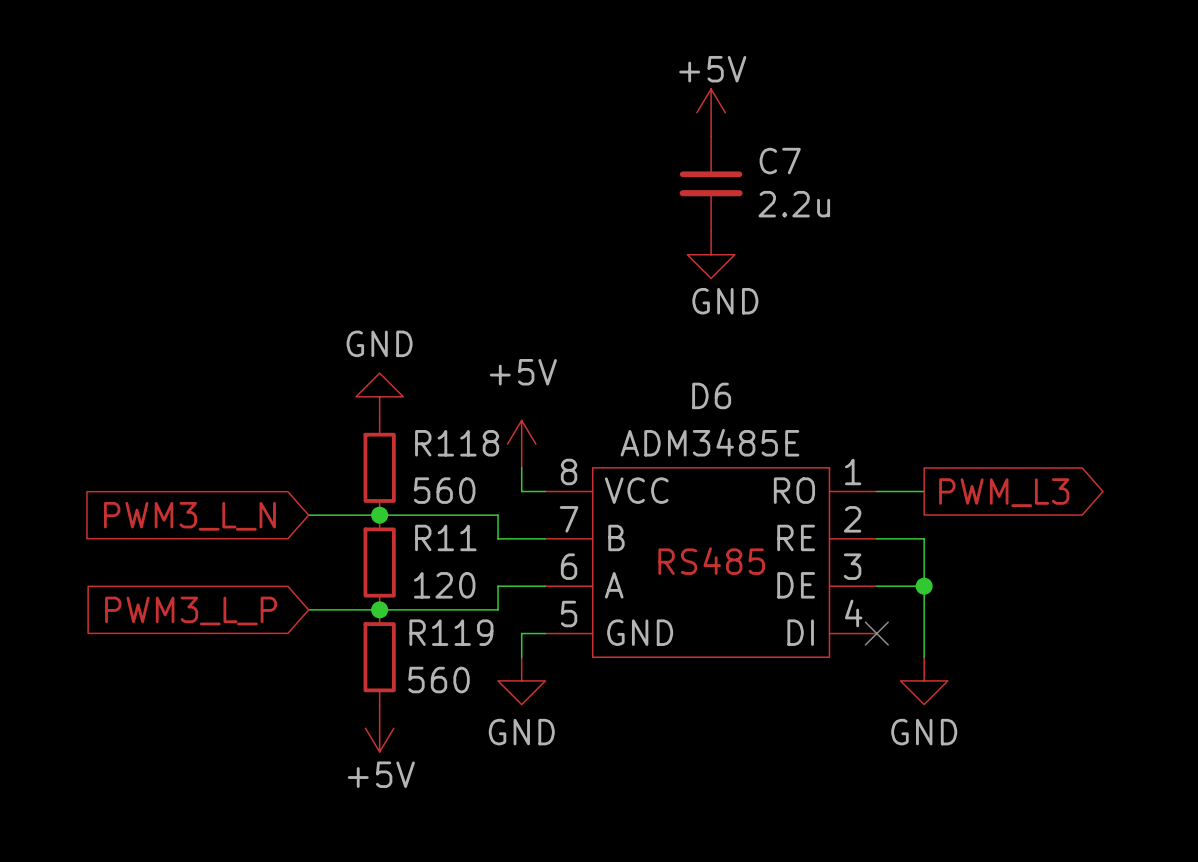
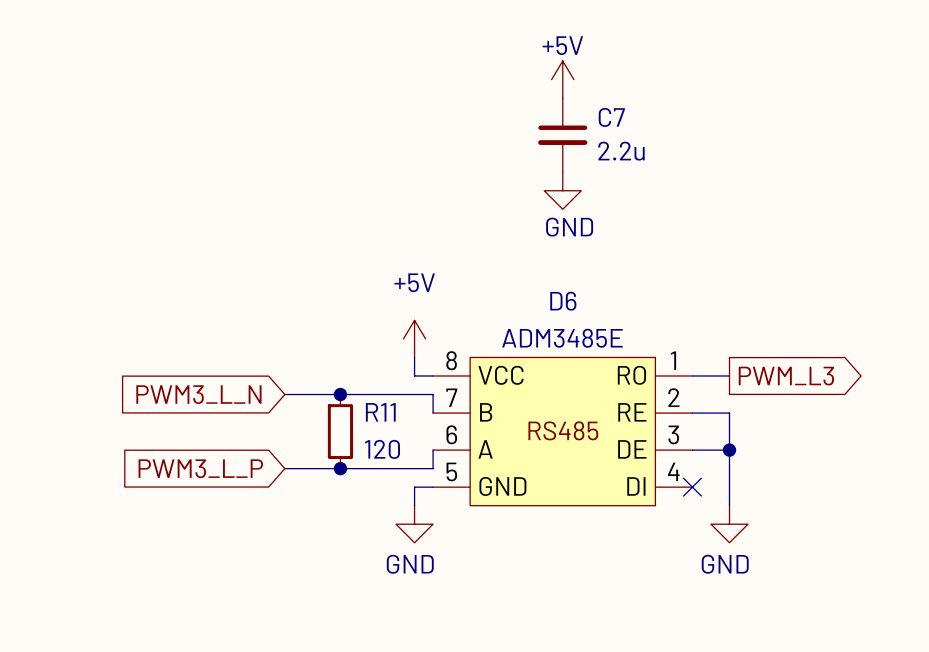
power symbol: GND (379, 396) -> none
R118: 560 (379, 467) -> none
wire: (308, 515) (355, 515) -> none
junction position: (379, 515) -> (340, 394)
wire: (498, 515) (498, 538) (545, 538) -> (396, 394) (433, 394) (433, 413)
global label position: PWM3_L_N (189, 516) -> PWM3_L_N (198, 394)
R11 position: (379, 562) -> (340, 431)
wire: (545, 586) (498, 586) (498, 609) -> (433, 450) (433, 468) (396, 468)
wire: (308, 609) (355, 609) -> none
junction position: (379, 609) -> (340, 468)
global label position: PWM3_L_P (191, 611) -> PWM3_L_P (200, 468)
R119: 560 (379, 657) -> none
power symbol: +5V (379, 728) -> none

